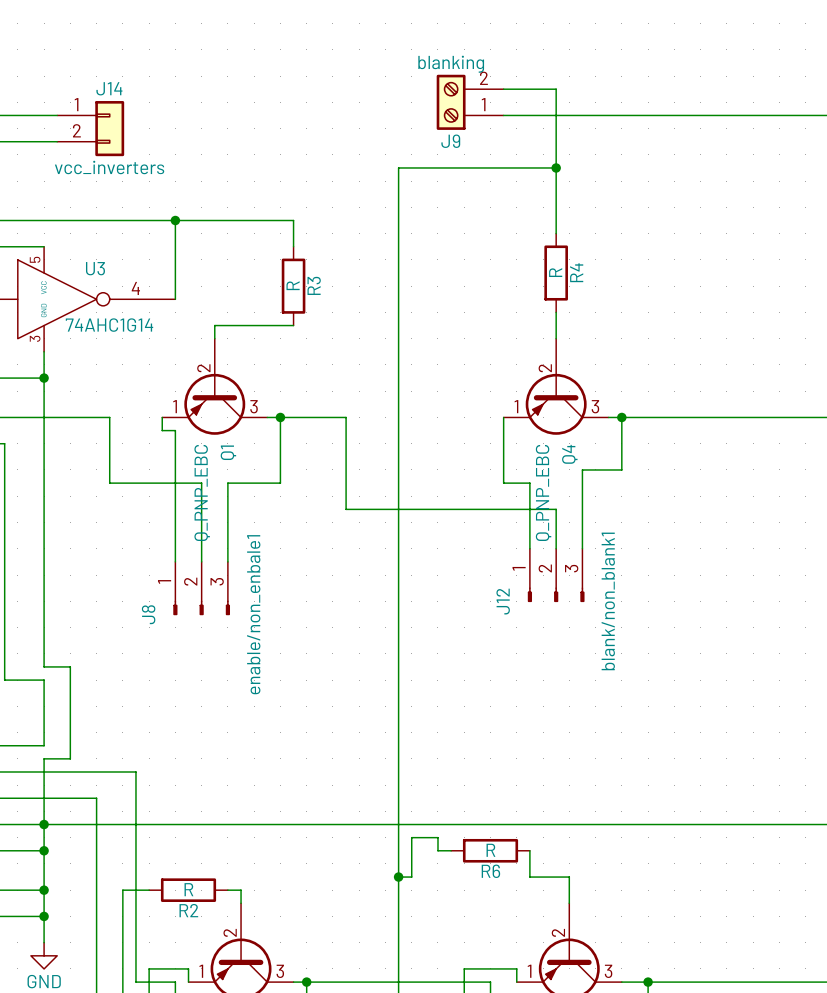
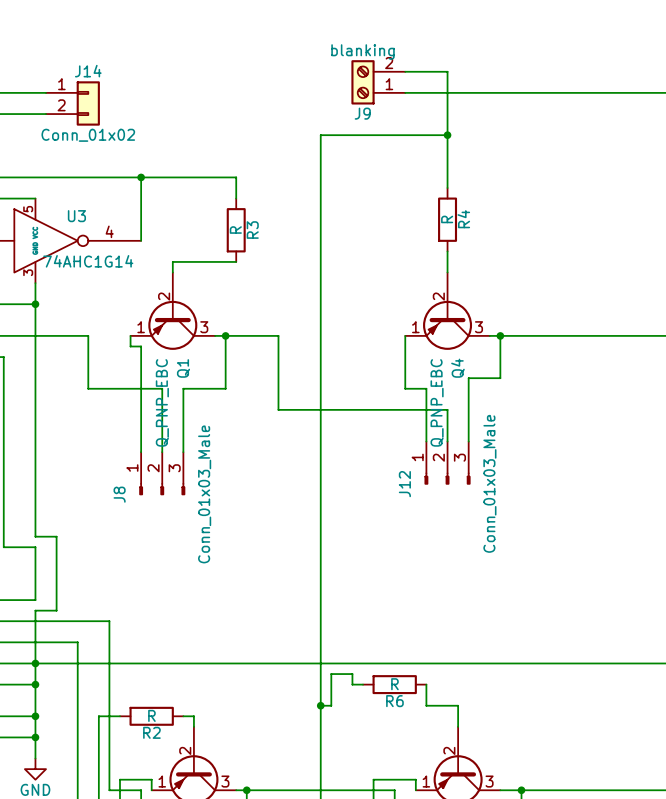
J14 value: vcc_inverters (109, 167) -> Conn_01x02 (88, 135)
J12 value: blank/non_blank1 (608, 601) -> Conn_01x03_Male (489, 483)
J8 value: enable/non_enbale1 (253, 614) -> Conn_01x03_Male (204, 494)

